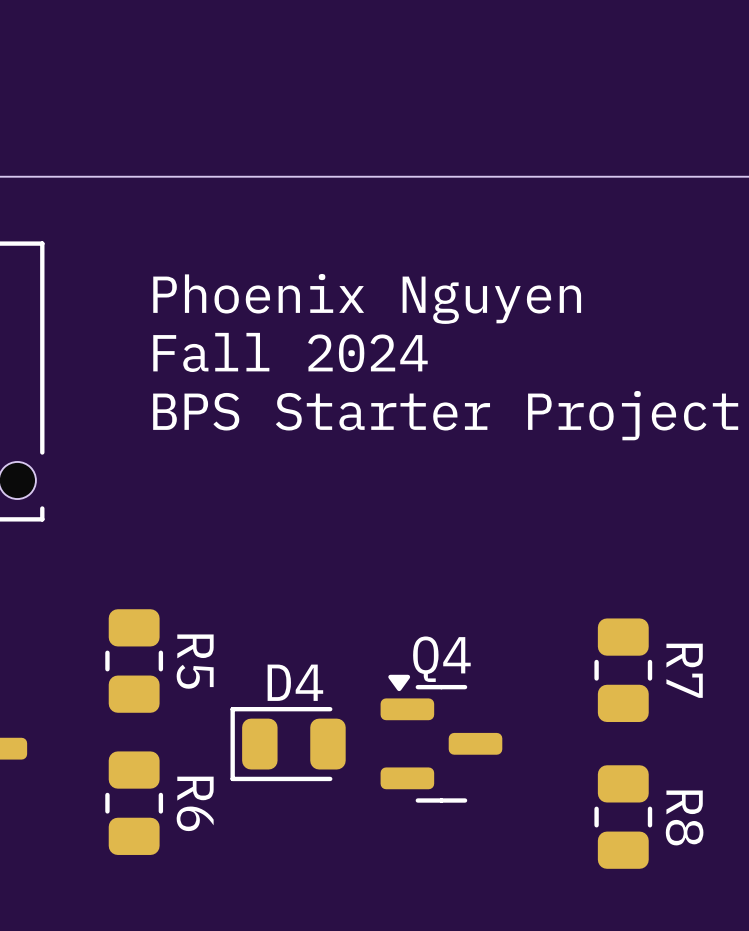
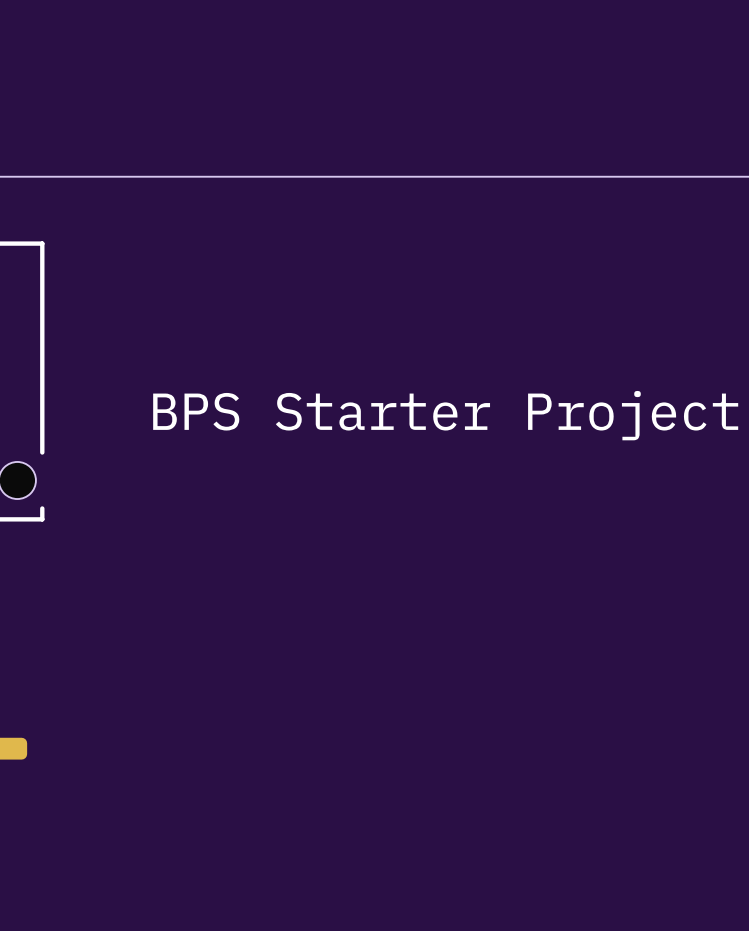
text: Phoenix Nguyen (367, 298) -> none
text: Fall 2024 (290, 352) -> none
R5: (134, 661) -> none
R7: (623, 670) -> none
Q4: (441, 738) -> none
D4: (288, 744) -> none
R6: (134, 803) -> none
R8: (623, 817) -> none

